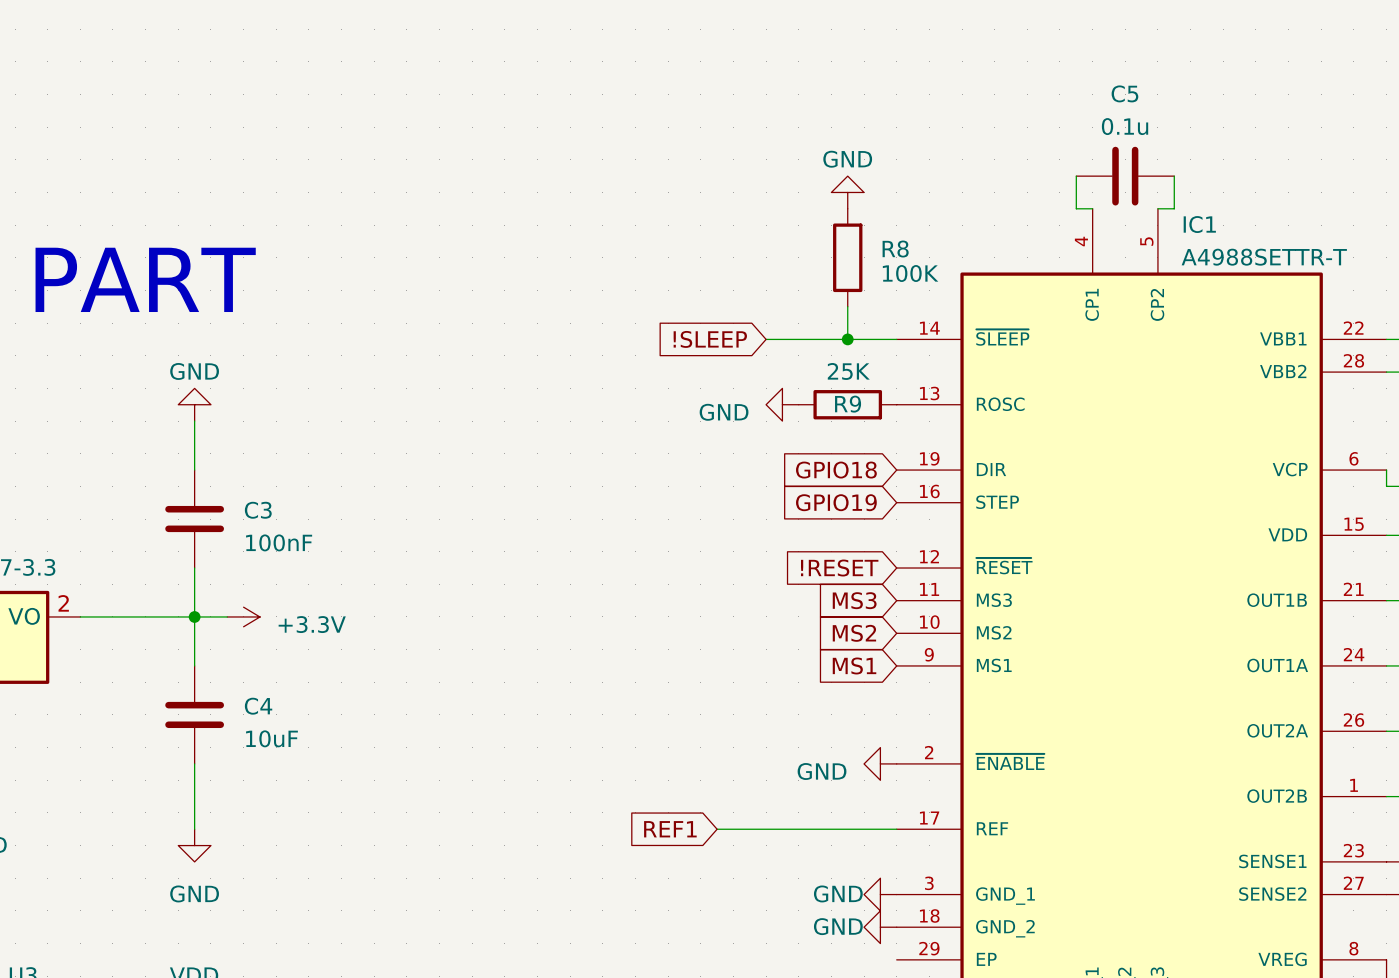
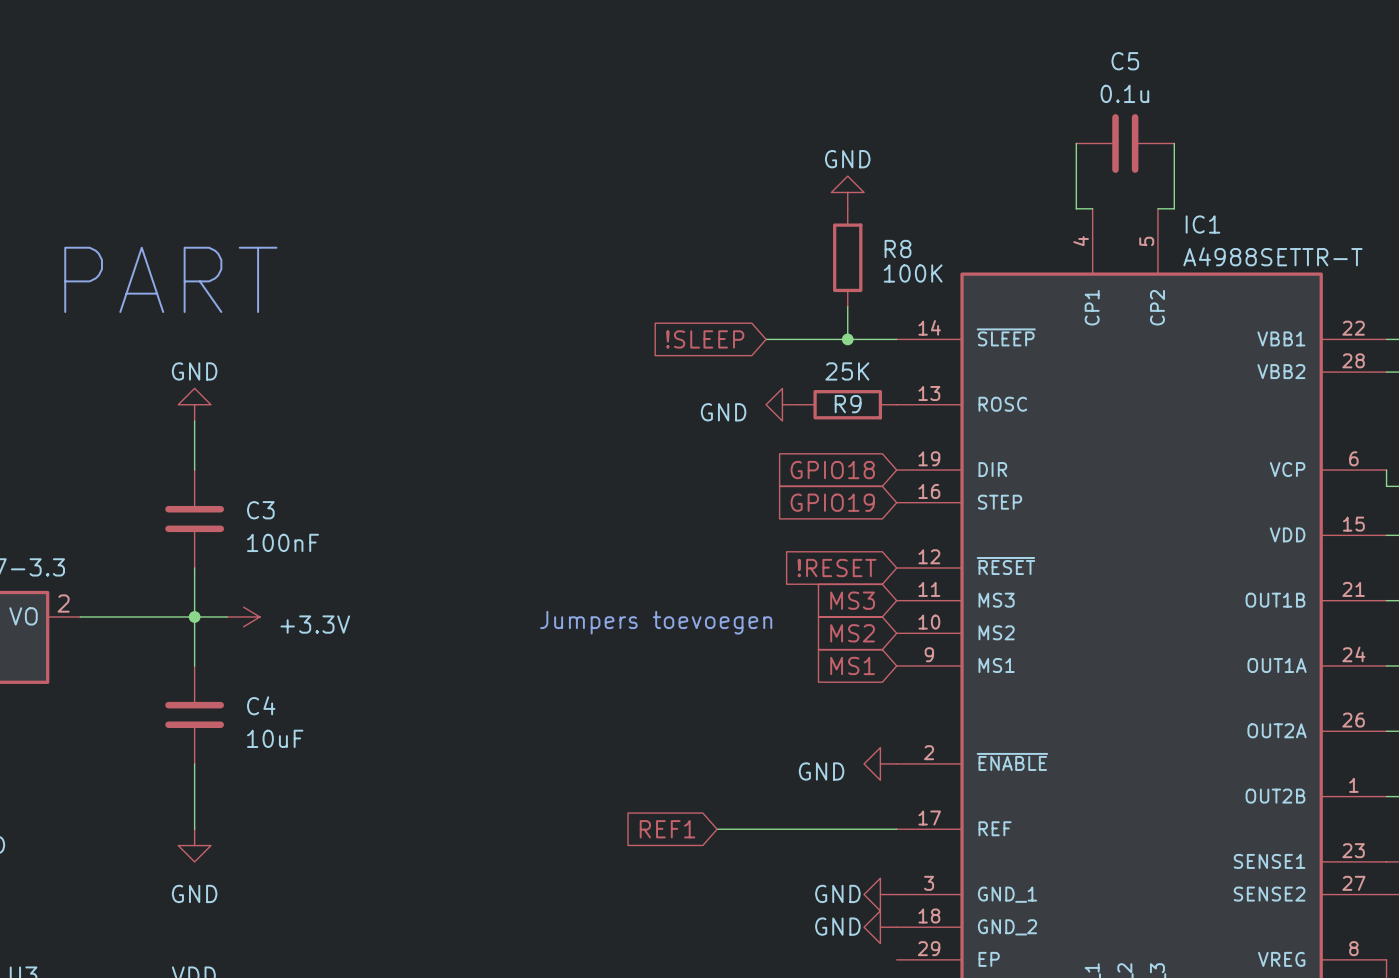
wire: none -> (1076, 143) (1076, 176)
wire: none -> (1174, 143) (1174, 176)
C5 position: (1125, 176) -> (1125, 143)
text: none -> Jumpers toevoegen (656, 622)

